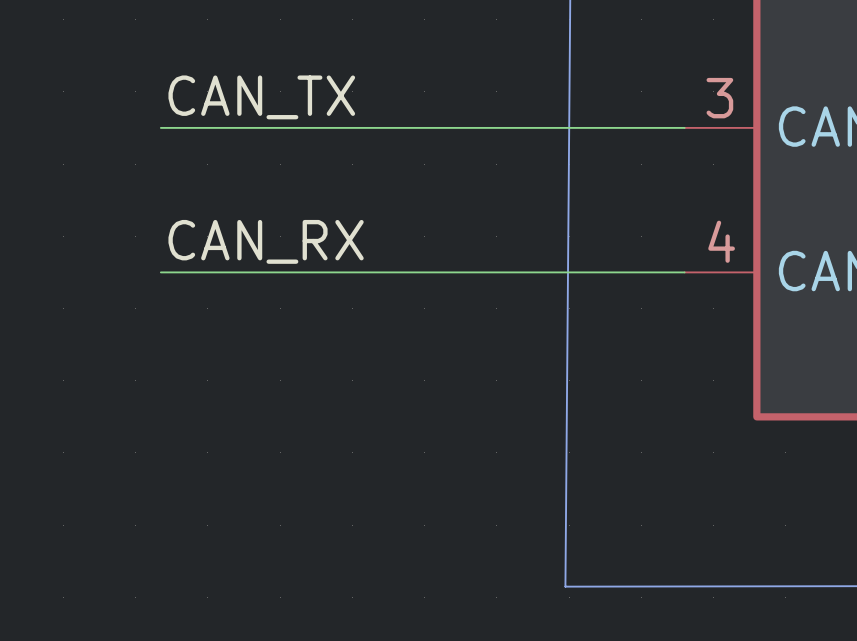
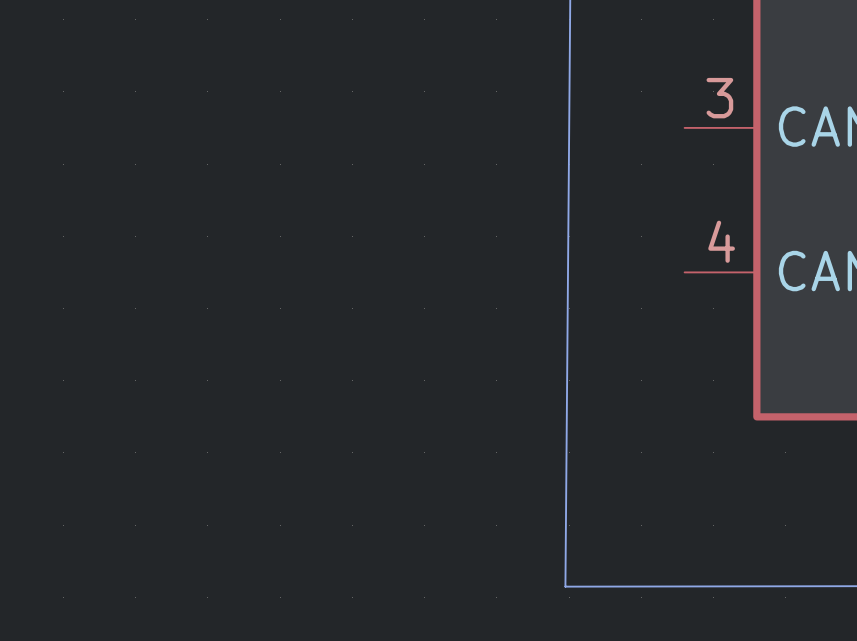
label: CAN_TX (261, 97) -> none
wire: (160, 127) (684, 127) -> none
label: CAN_RX (266, 241) -> none
wire: (160, 272) (684, 272) -> none

